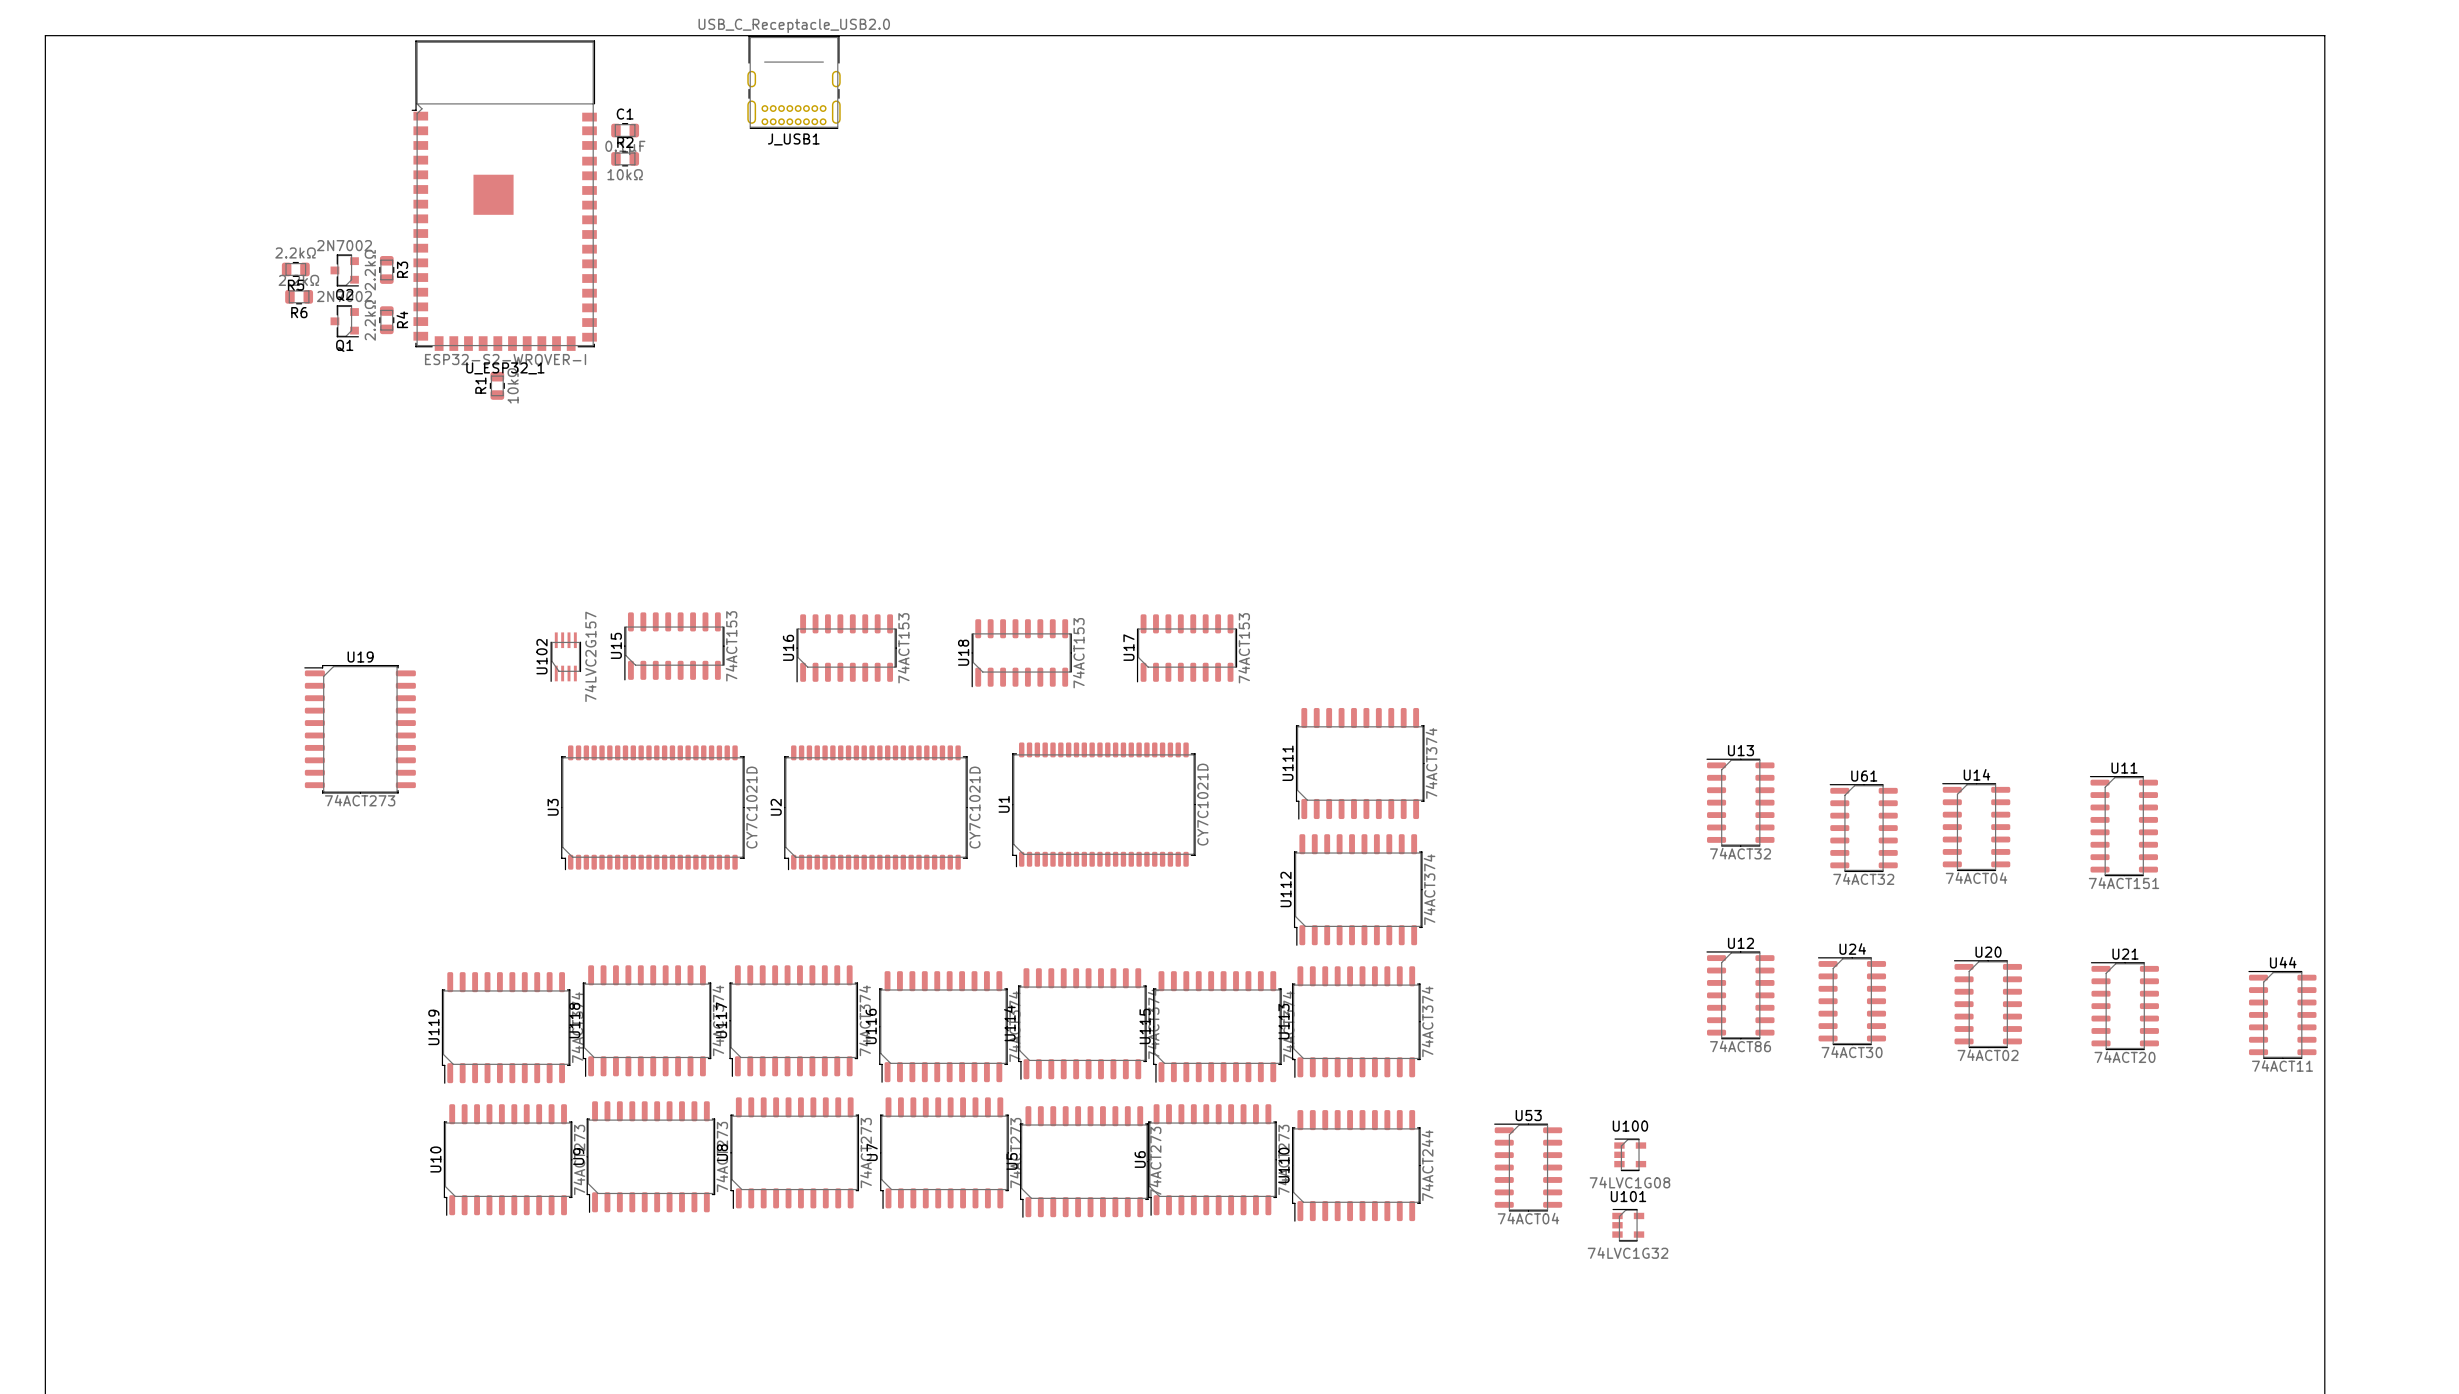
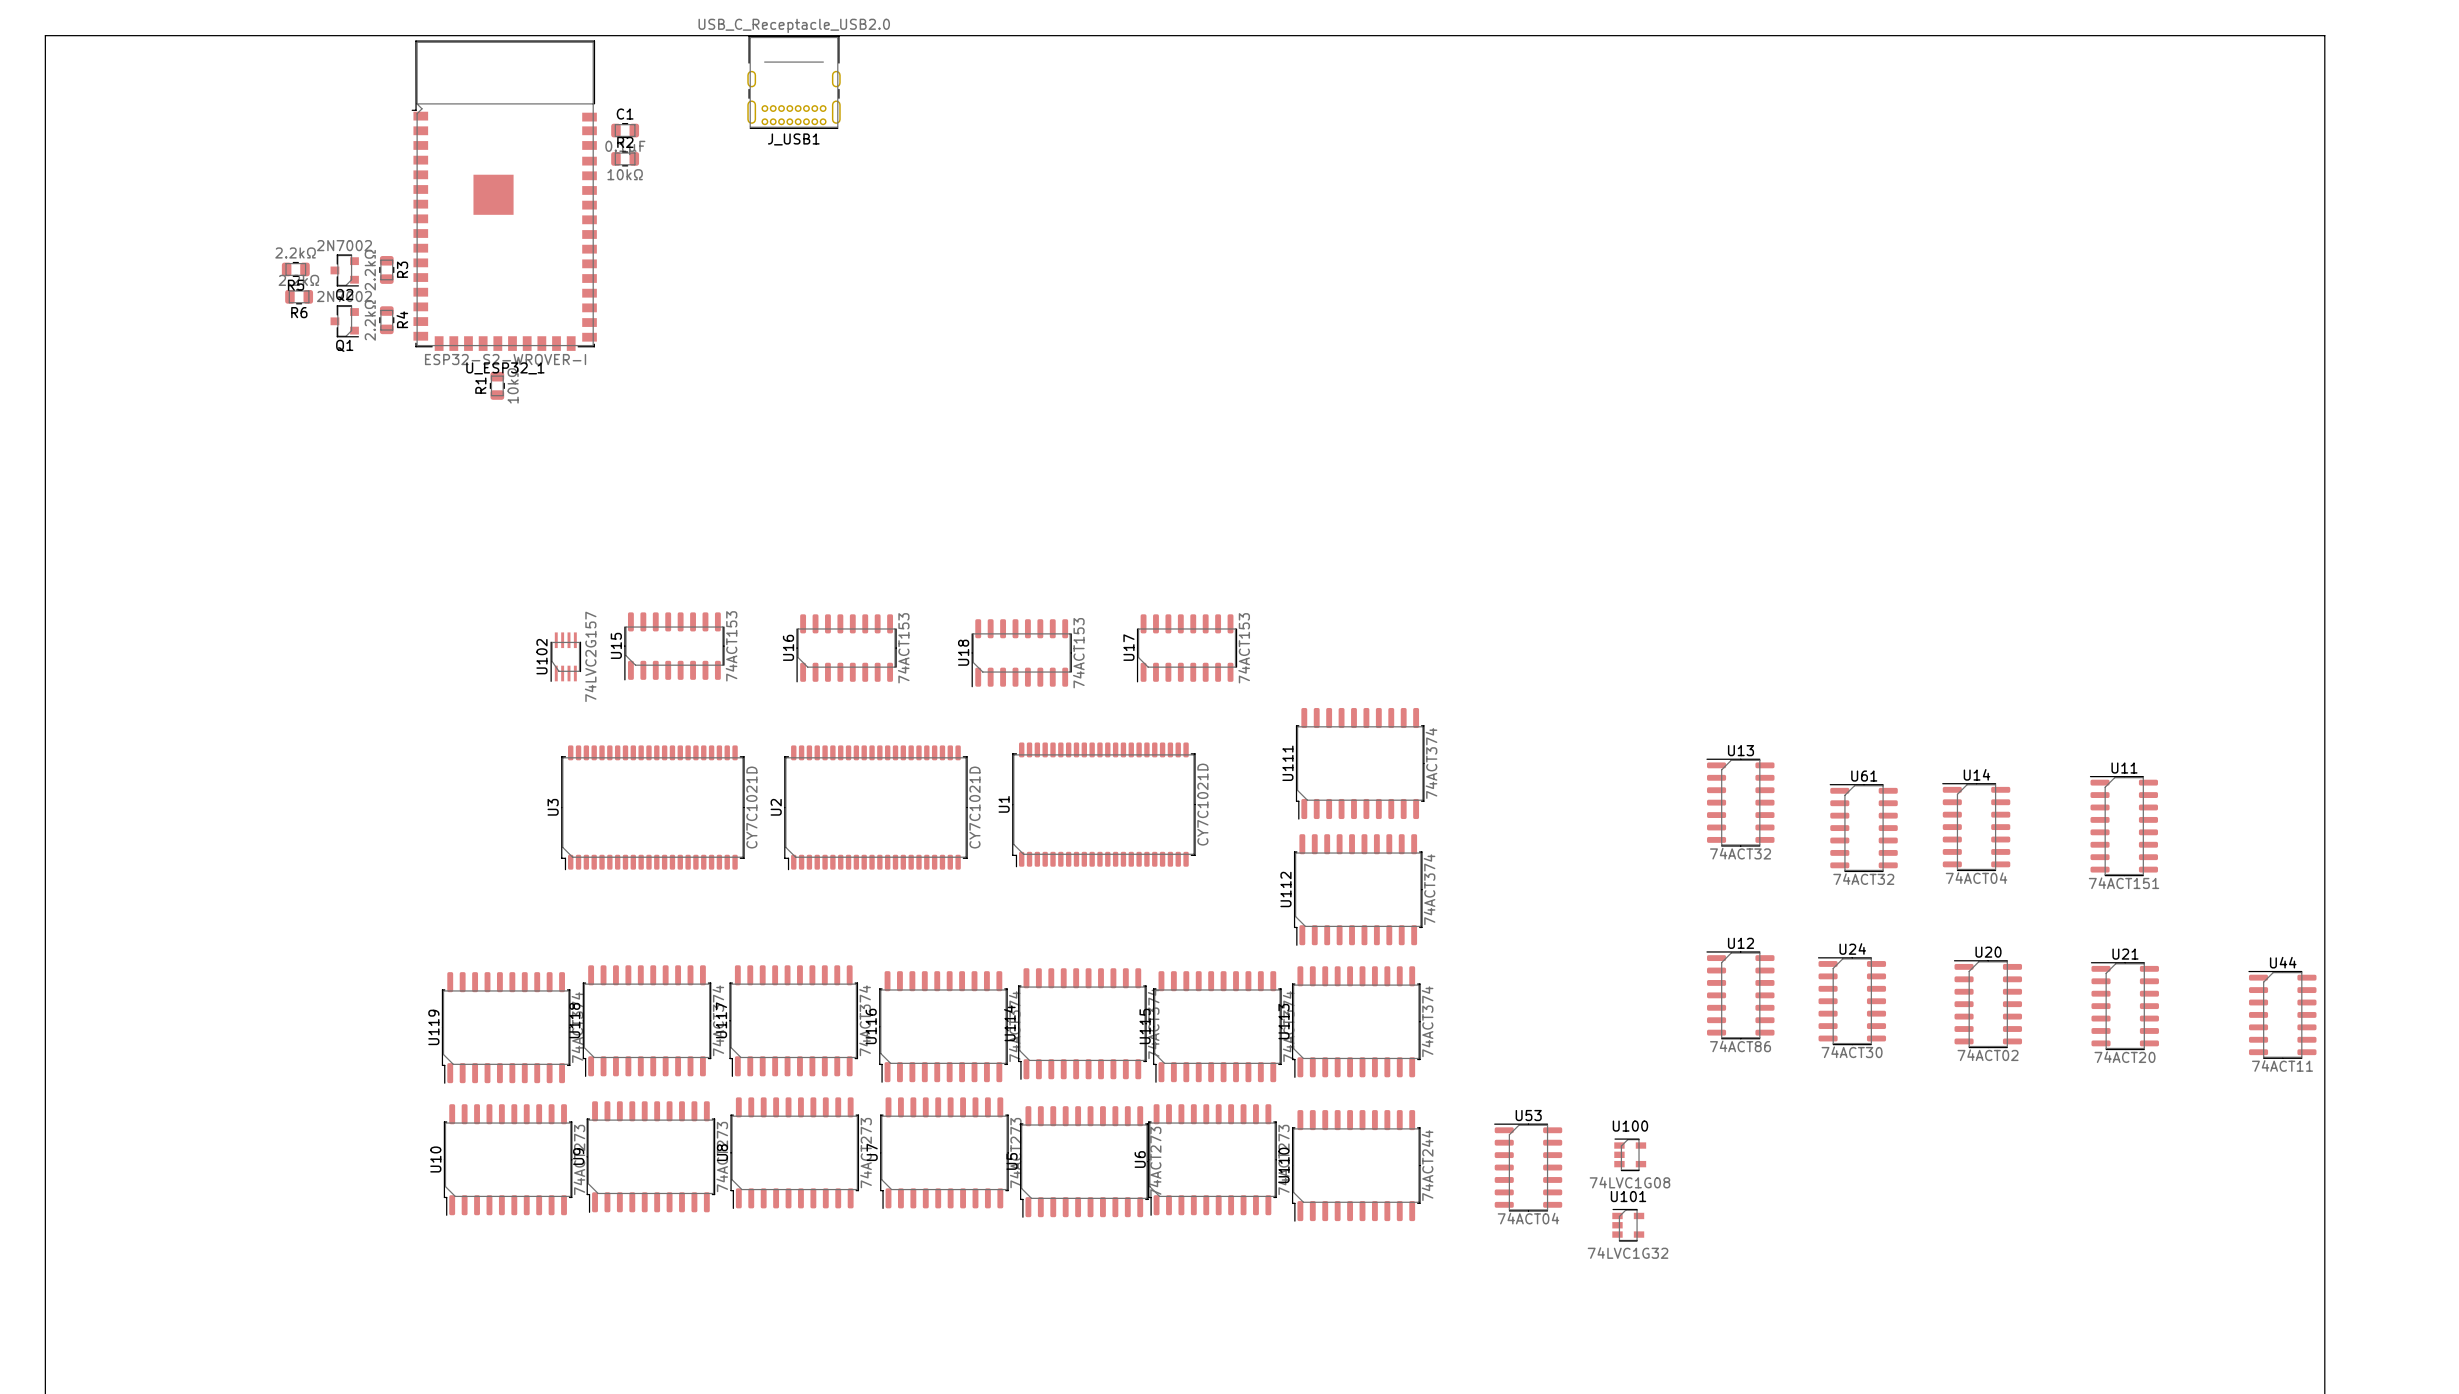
U19: 74ACT273 (360, 729) -> none

